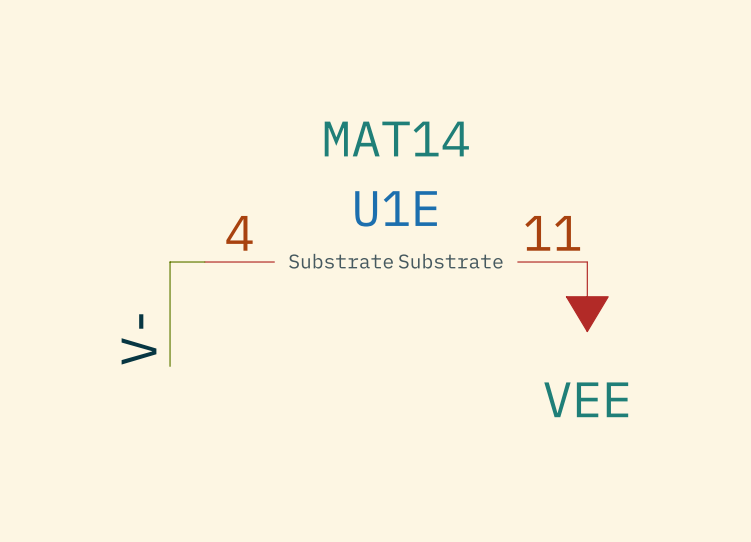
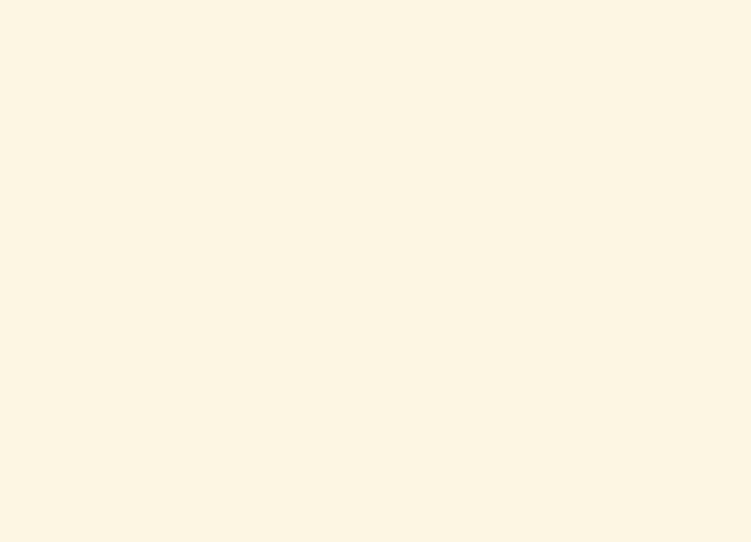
wire: (204, 262) (170, 262) (170, 366) -> none
U1E: MAT14 (396, 262) -> none
power symbol: VEE (587, 296) -> none
label: V- (139, 339) -> none

